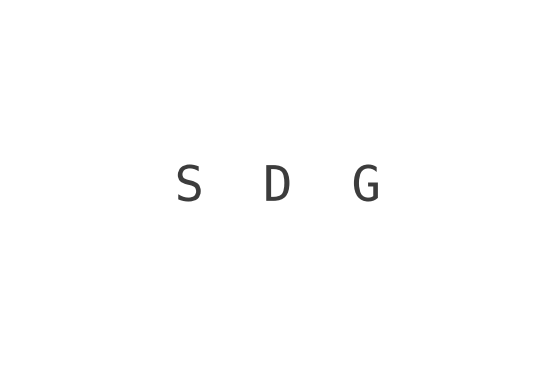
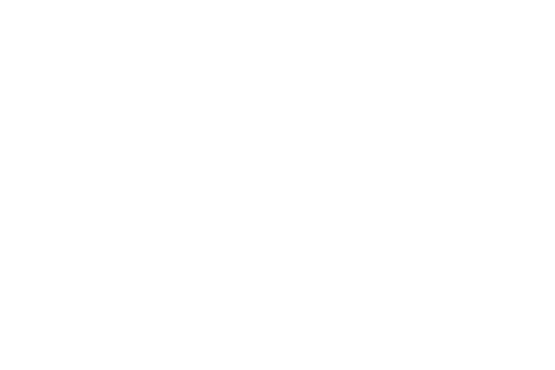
drawing: [177, 164, 378, 202] -> none

